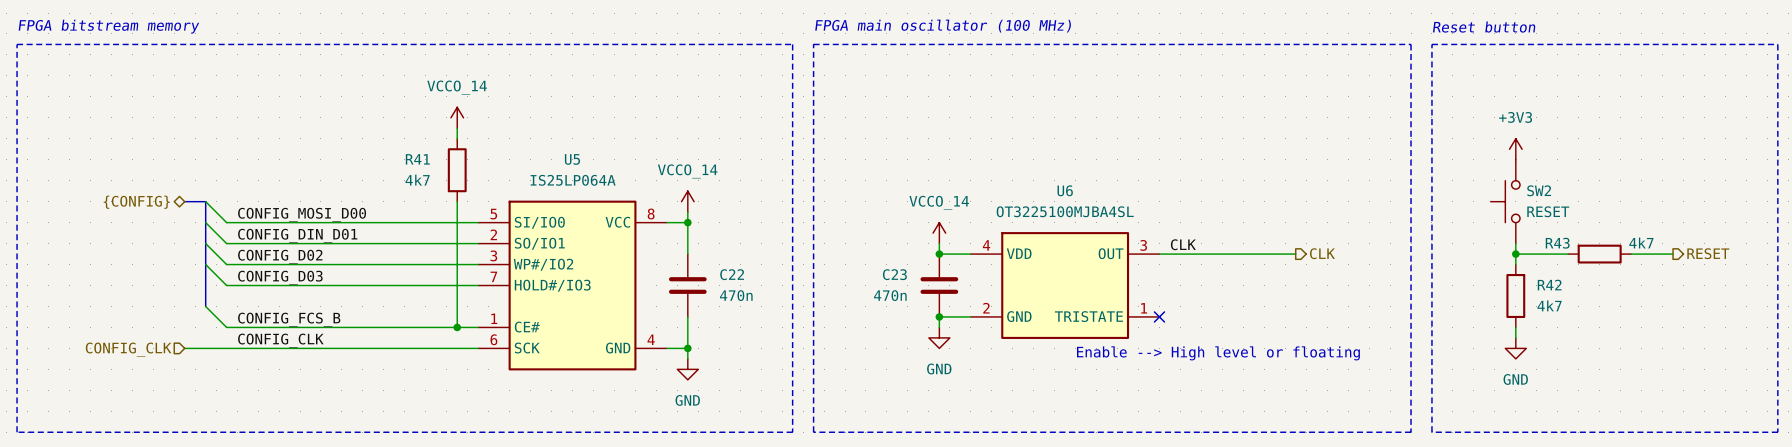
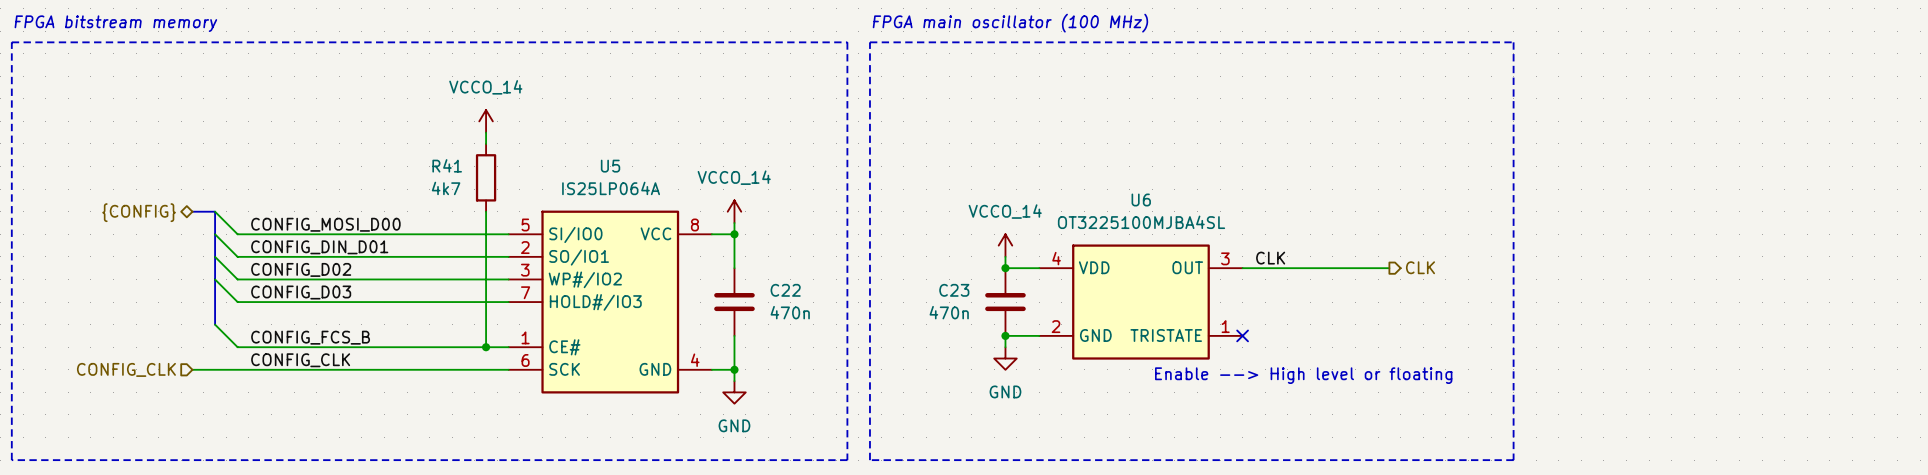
text: Reset button (1484, 27) -> none
line: (1431, 44) (1777, 44) (1777, 432) (1431, 432) (1431, 44) -> none
power symbol: +3V3 (1515, 149) -> none
SW2: RESET (1505, 201) -> none
wire: (1515, 243) (1515, 264) -> none
hierarchical label: RESET (1708, 253) -> none
wire: (1515, 254) (1568, 254) -> none
junction: (1515, 254) -> none
R43: 4k7 (1599, 254) -> none
wire: (1631, 254) (1673, 254) -> none
R42: 4k7 (1515, 296) -> none
wire: (1515, 327) (1515, 337) -> none
power symbol: GND (1515, 348) -> none

